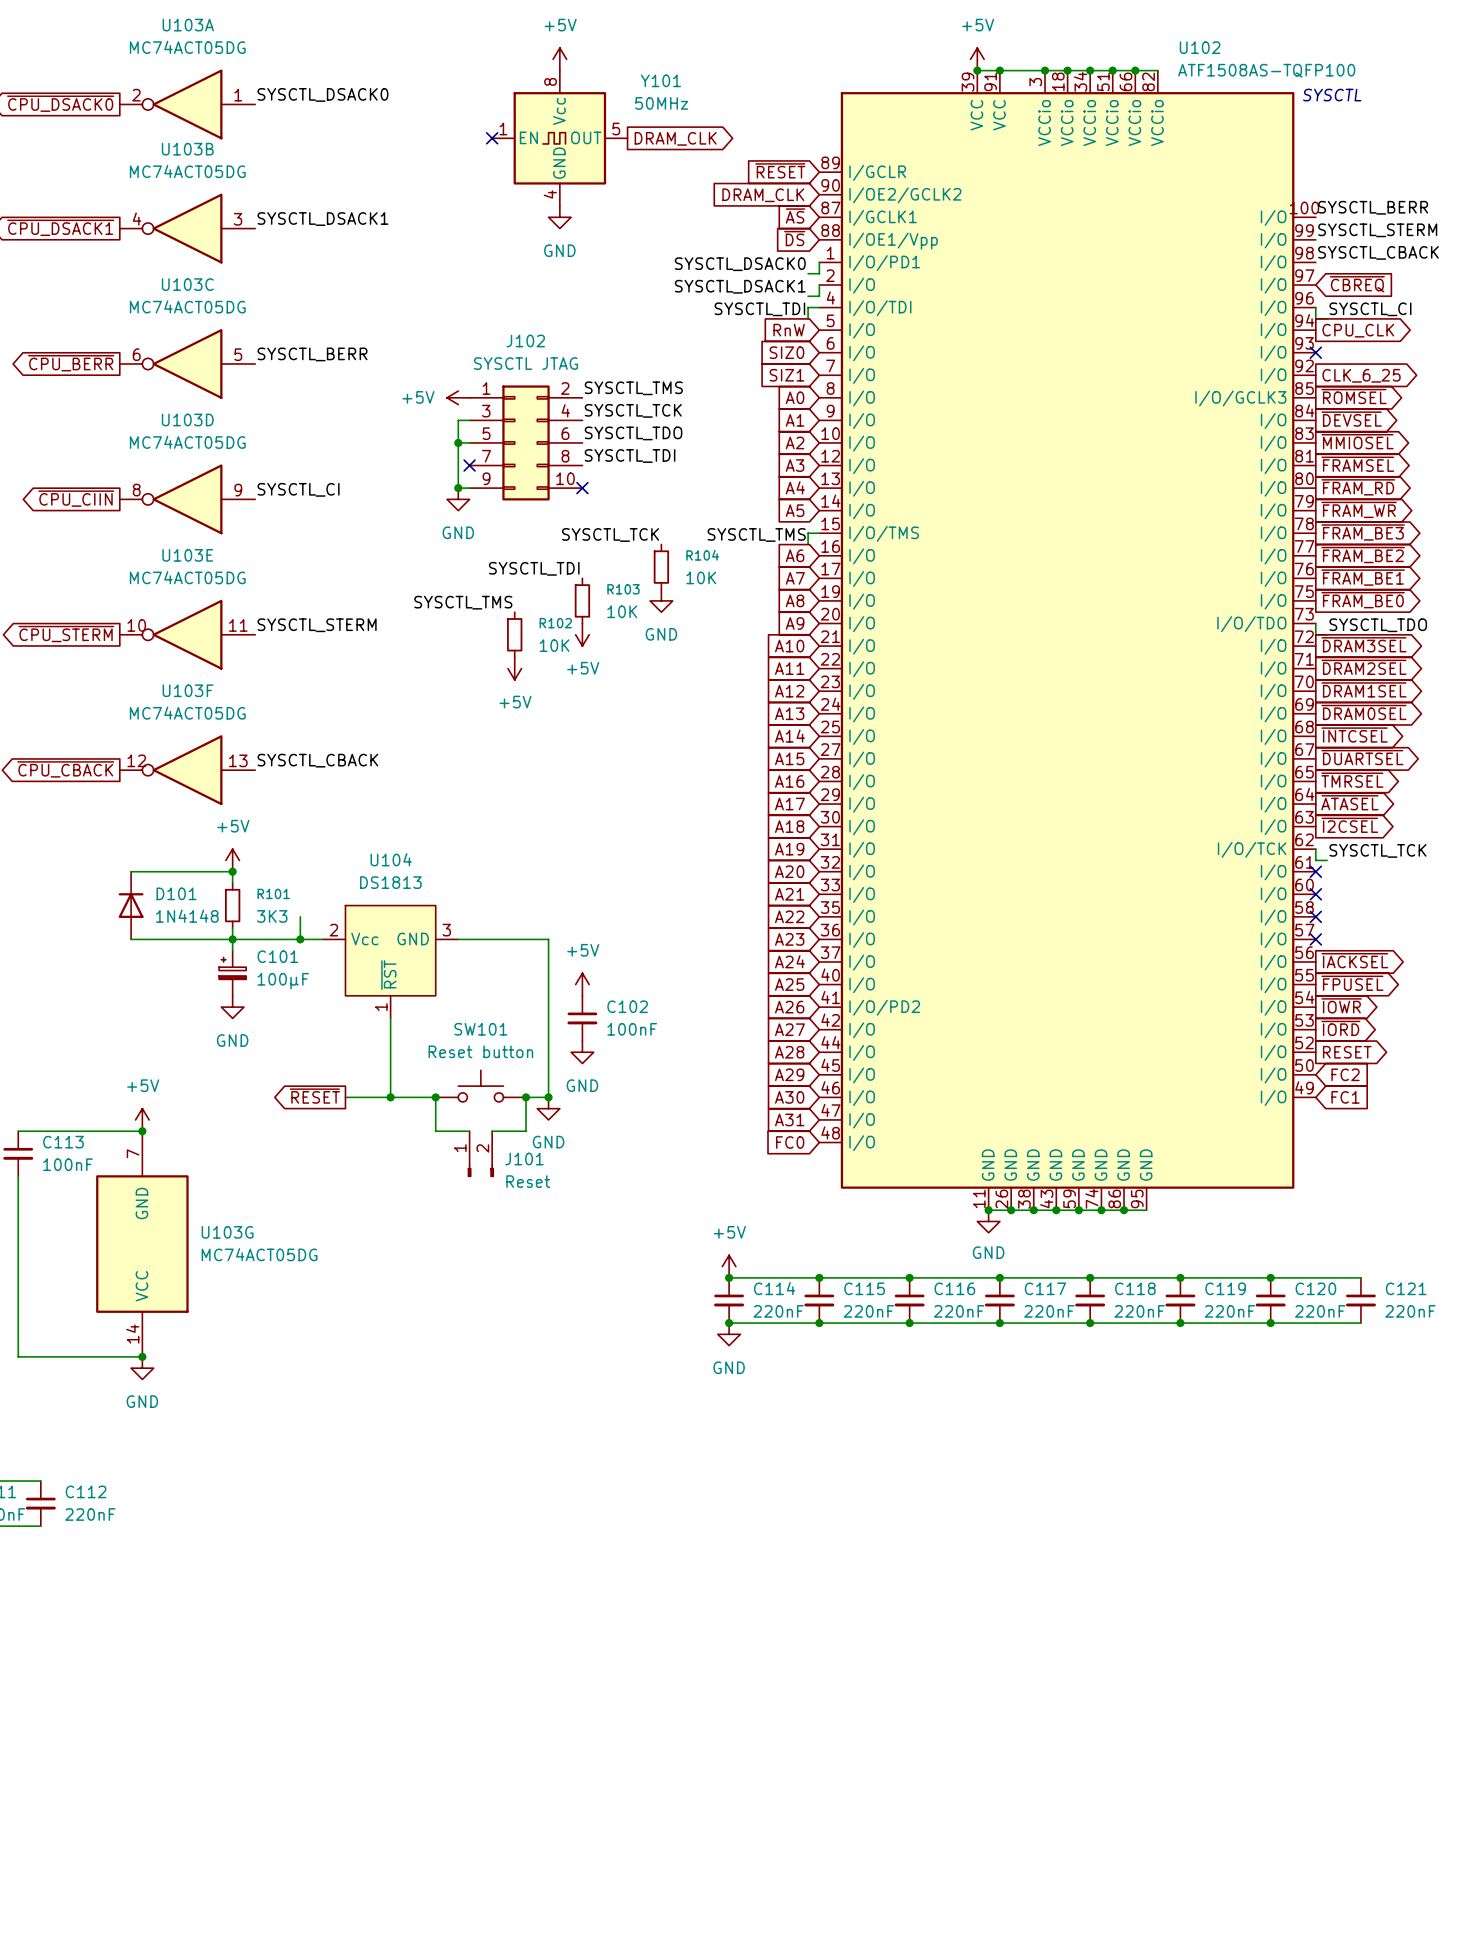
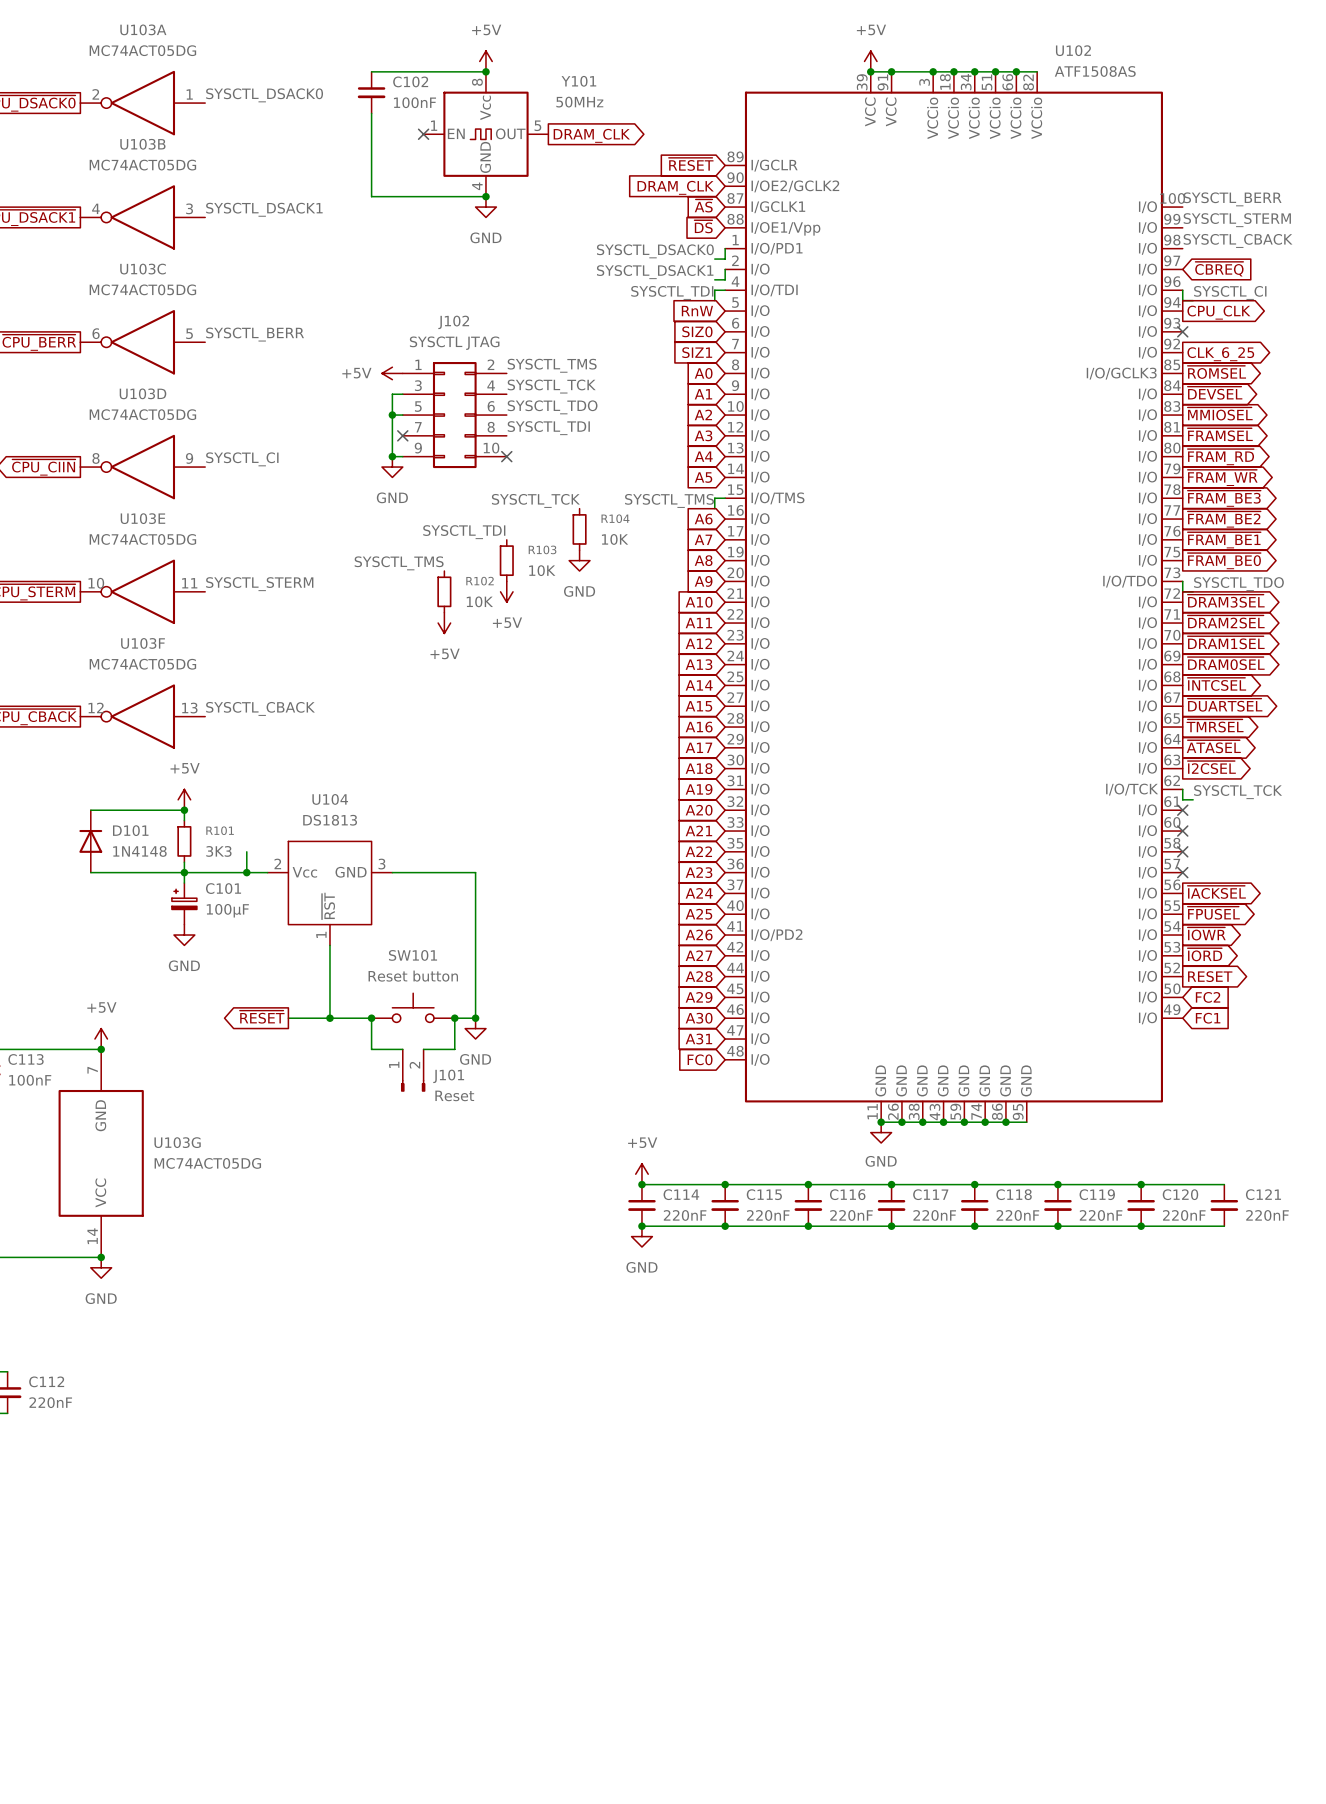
wire: none -> (371, 71) (485, 71)
junction: none -> (485, 71)
U102 value: ATF1508AS-TQFP100 (1266, 70) -> ATF1508AS (1095, 71)
text: SYSCTL (1332, 95) -> none
wire: none -> (371, 113) (371, 196) (485, 196)
junction: none -> (485, 196)
power symbol: +5V (582, 984) -> none
C102 position: (582, 1018) -> (371, 92)
power symbol: GND (582, 1052) -> none

